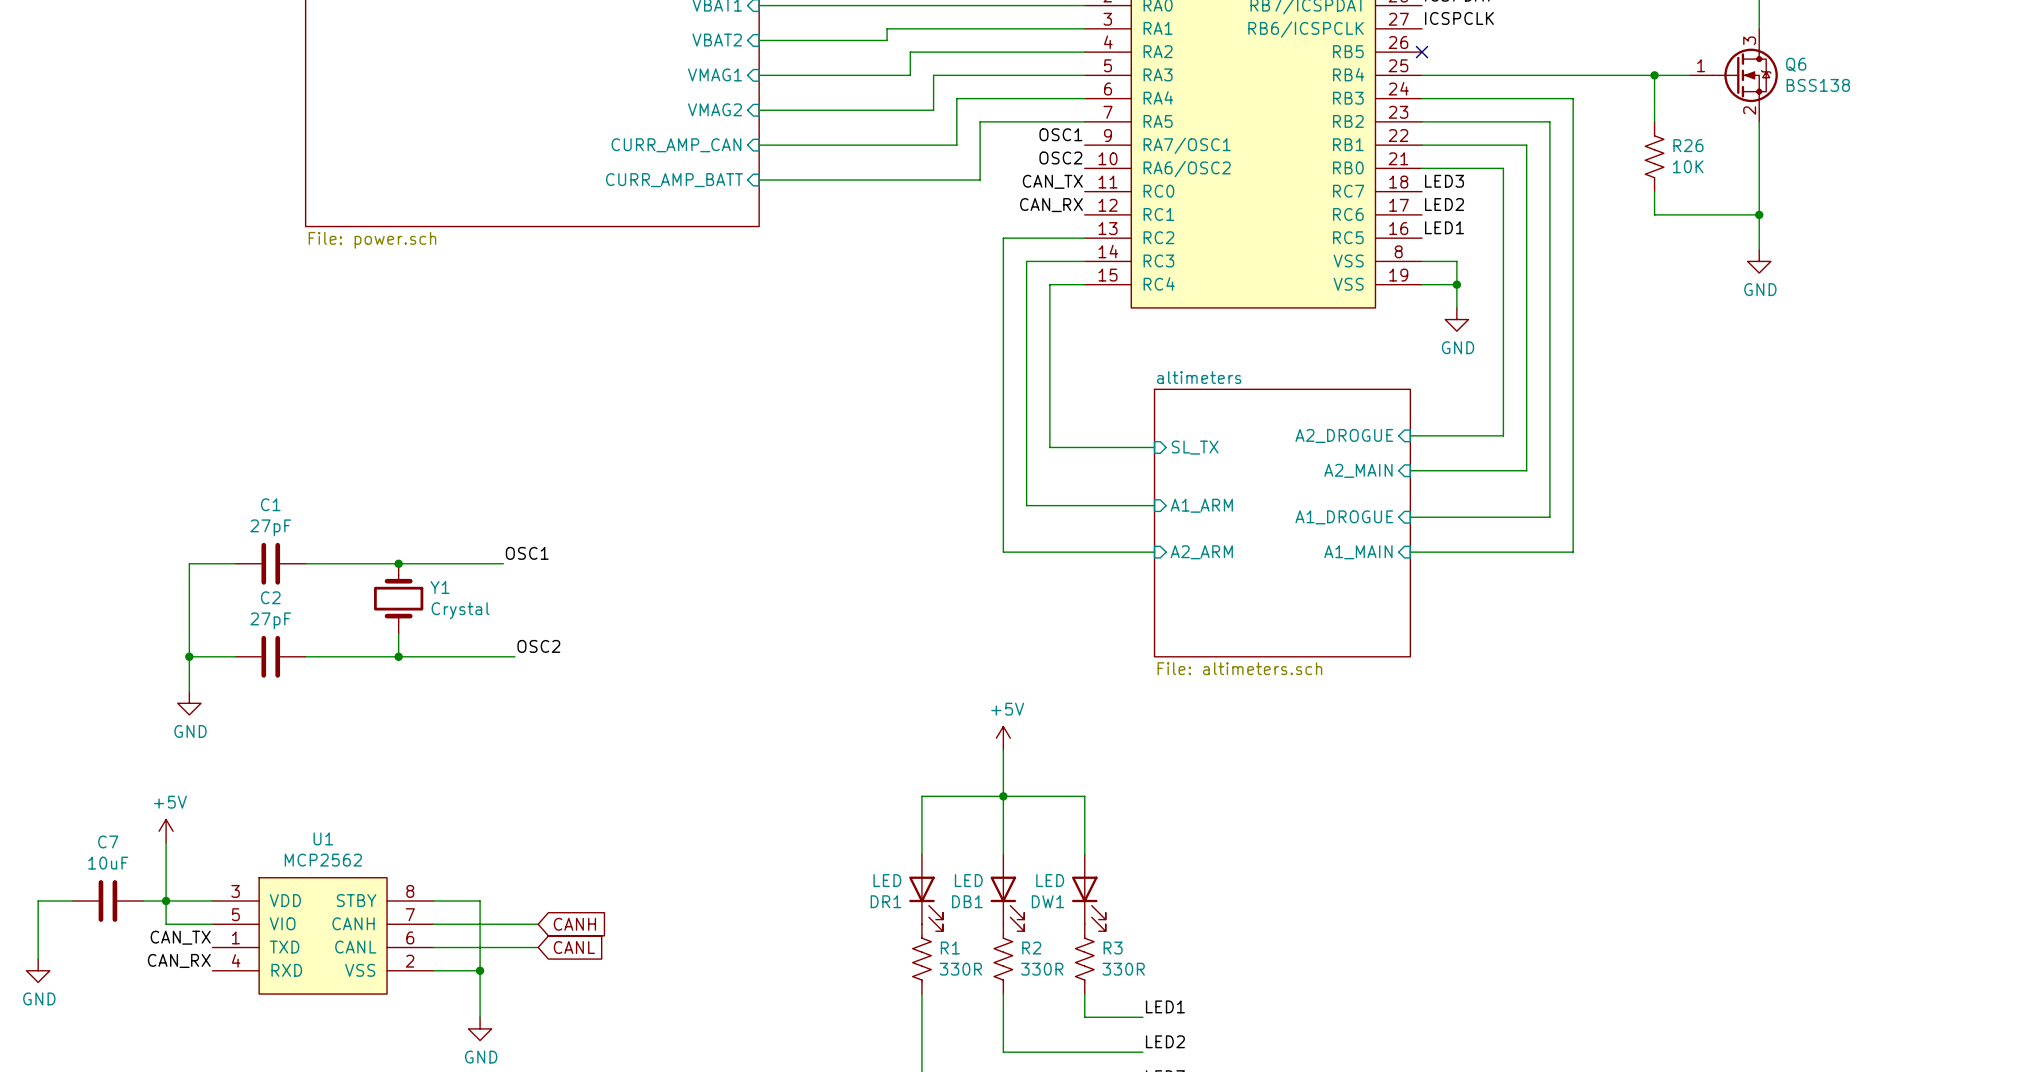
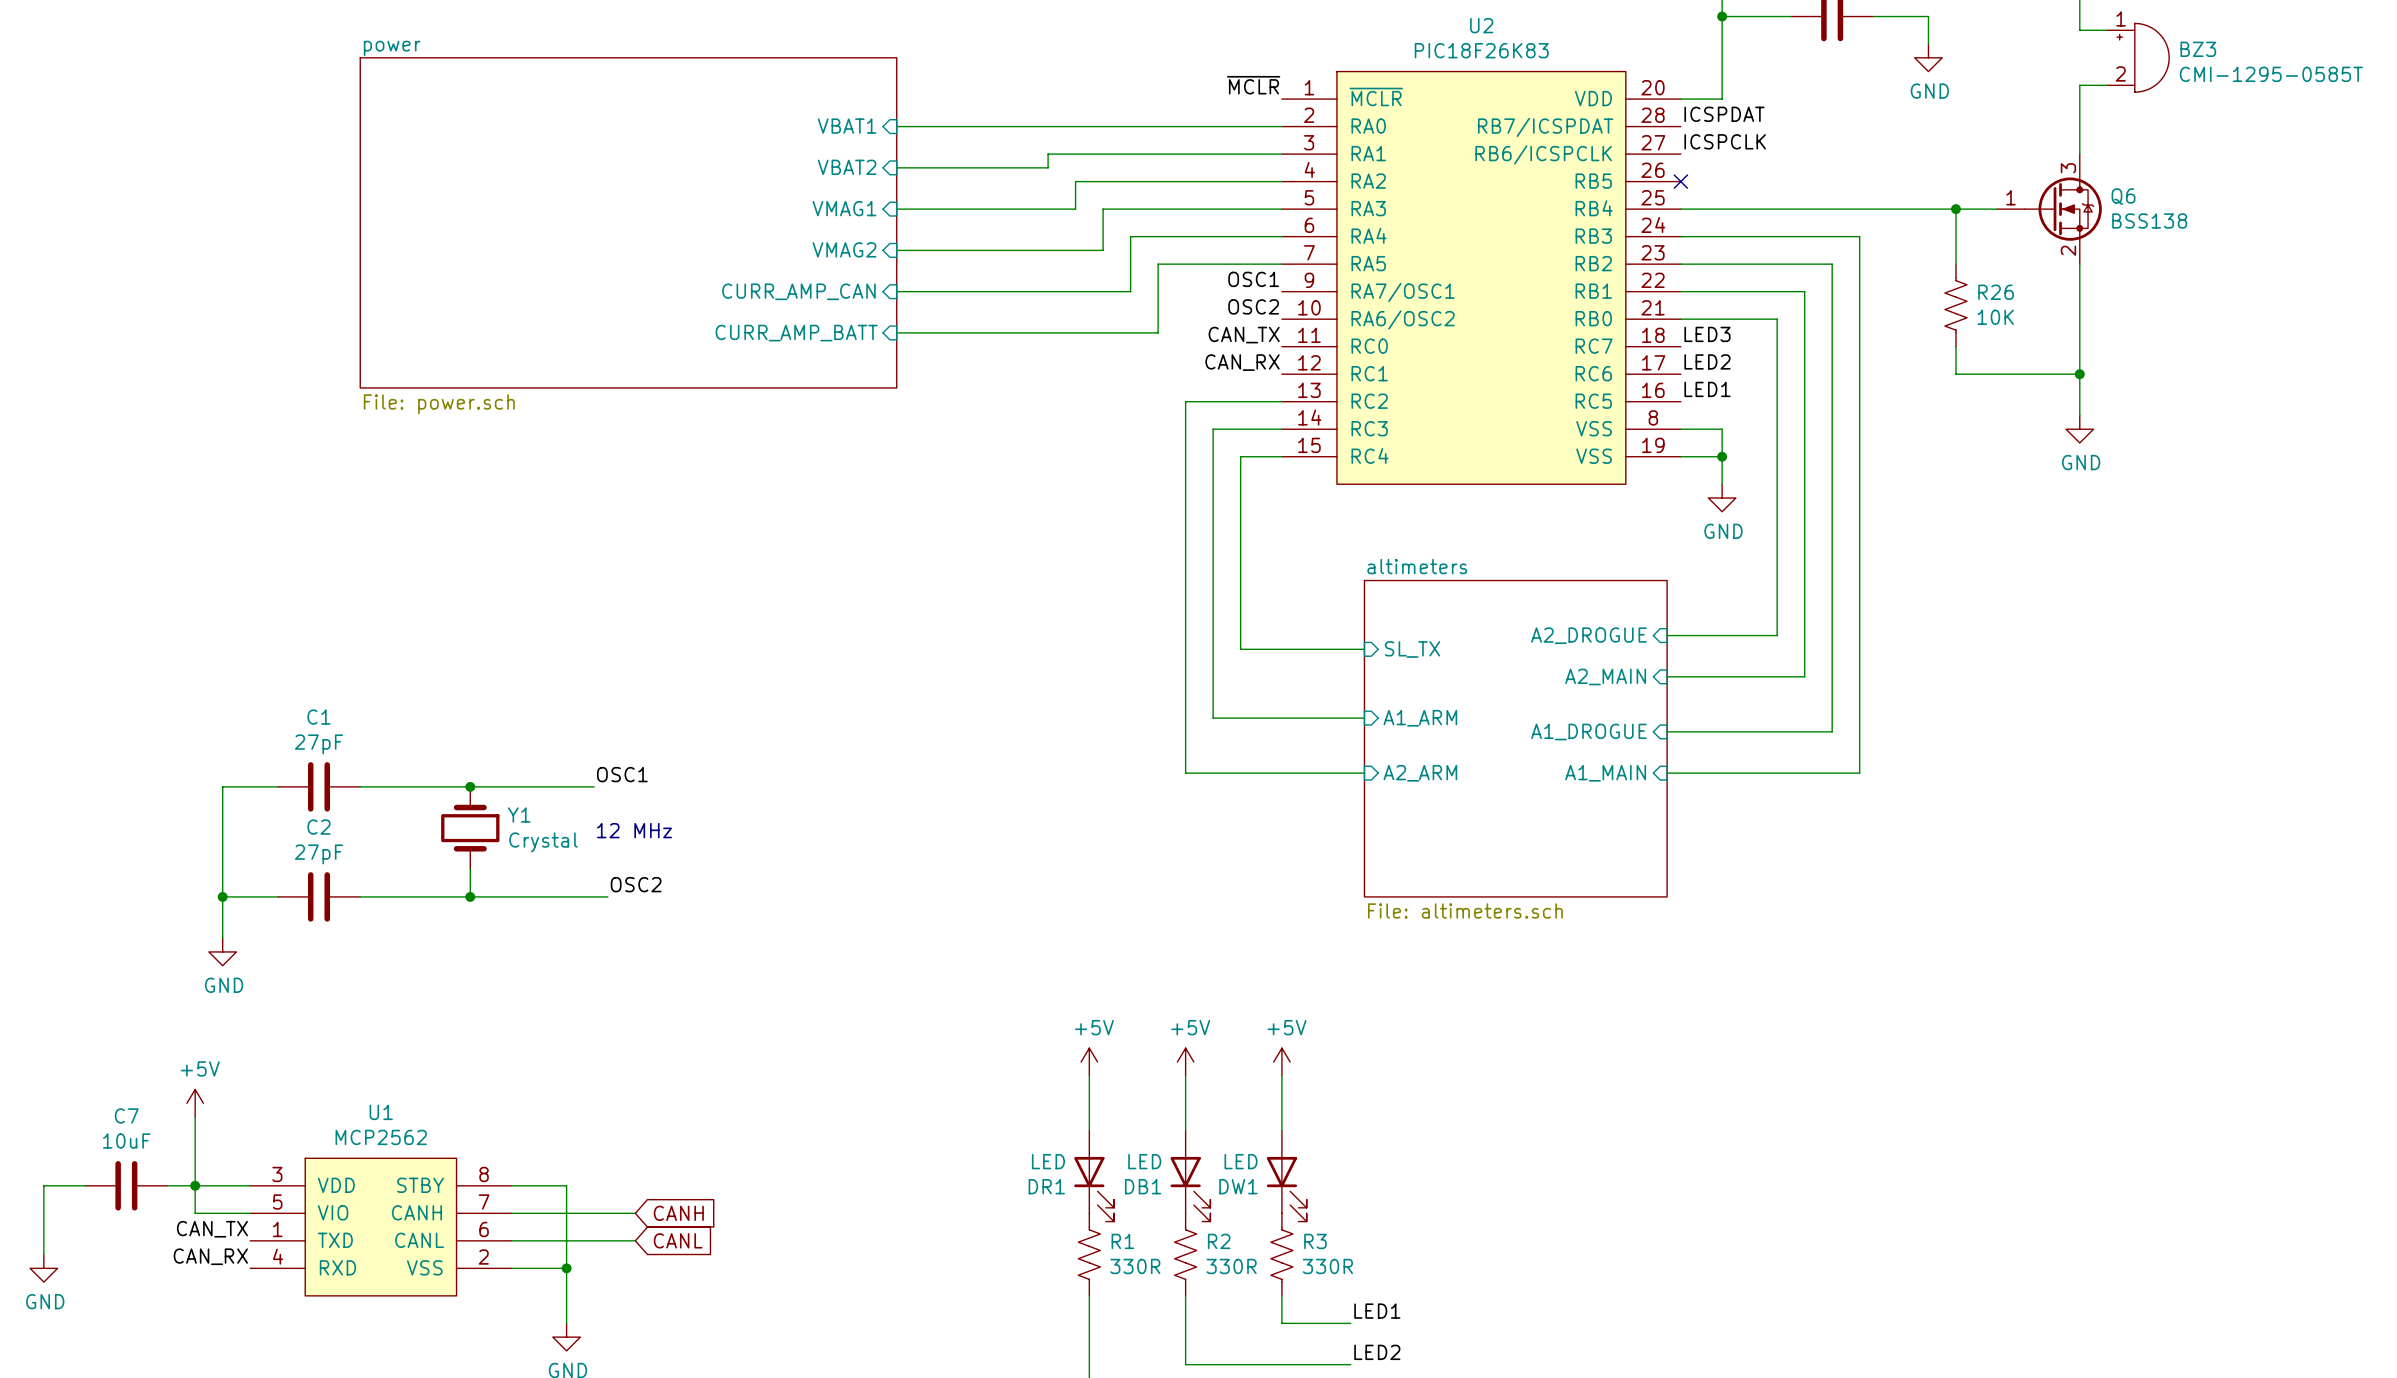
text: none -> 12 MHz (634, 830)
power symbol: +5V (1003, 738) -> none
wire: (1003, 749) (1003, 807) -> none
power symbol: none -> +5V (1089, 1062)
power symbol: none -> +5V (1185, 1062)
junction: (1003, 796) -> none
power symbol: none -> +5V (1281, 1062)
wire: (921, 807) (921, 796) (1084, 796) (1084, 807) -> none

